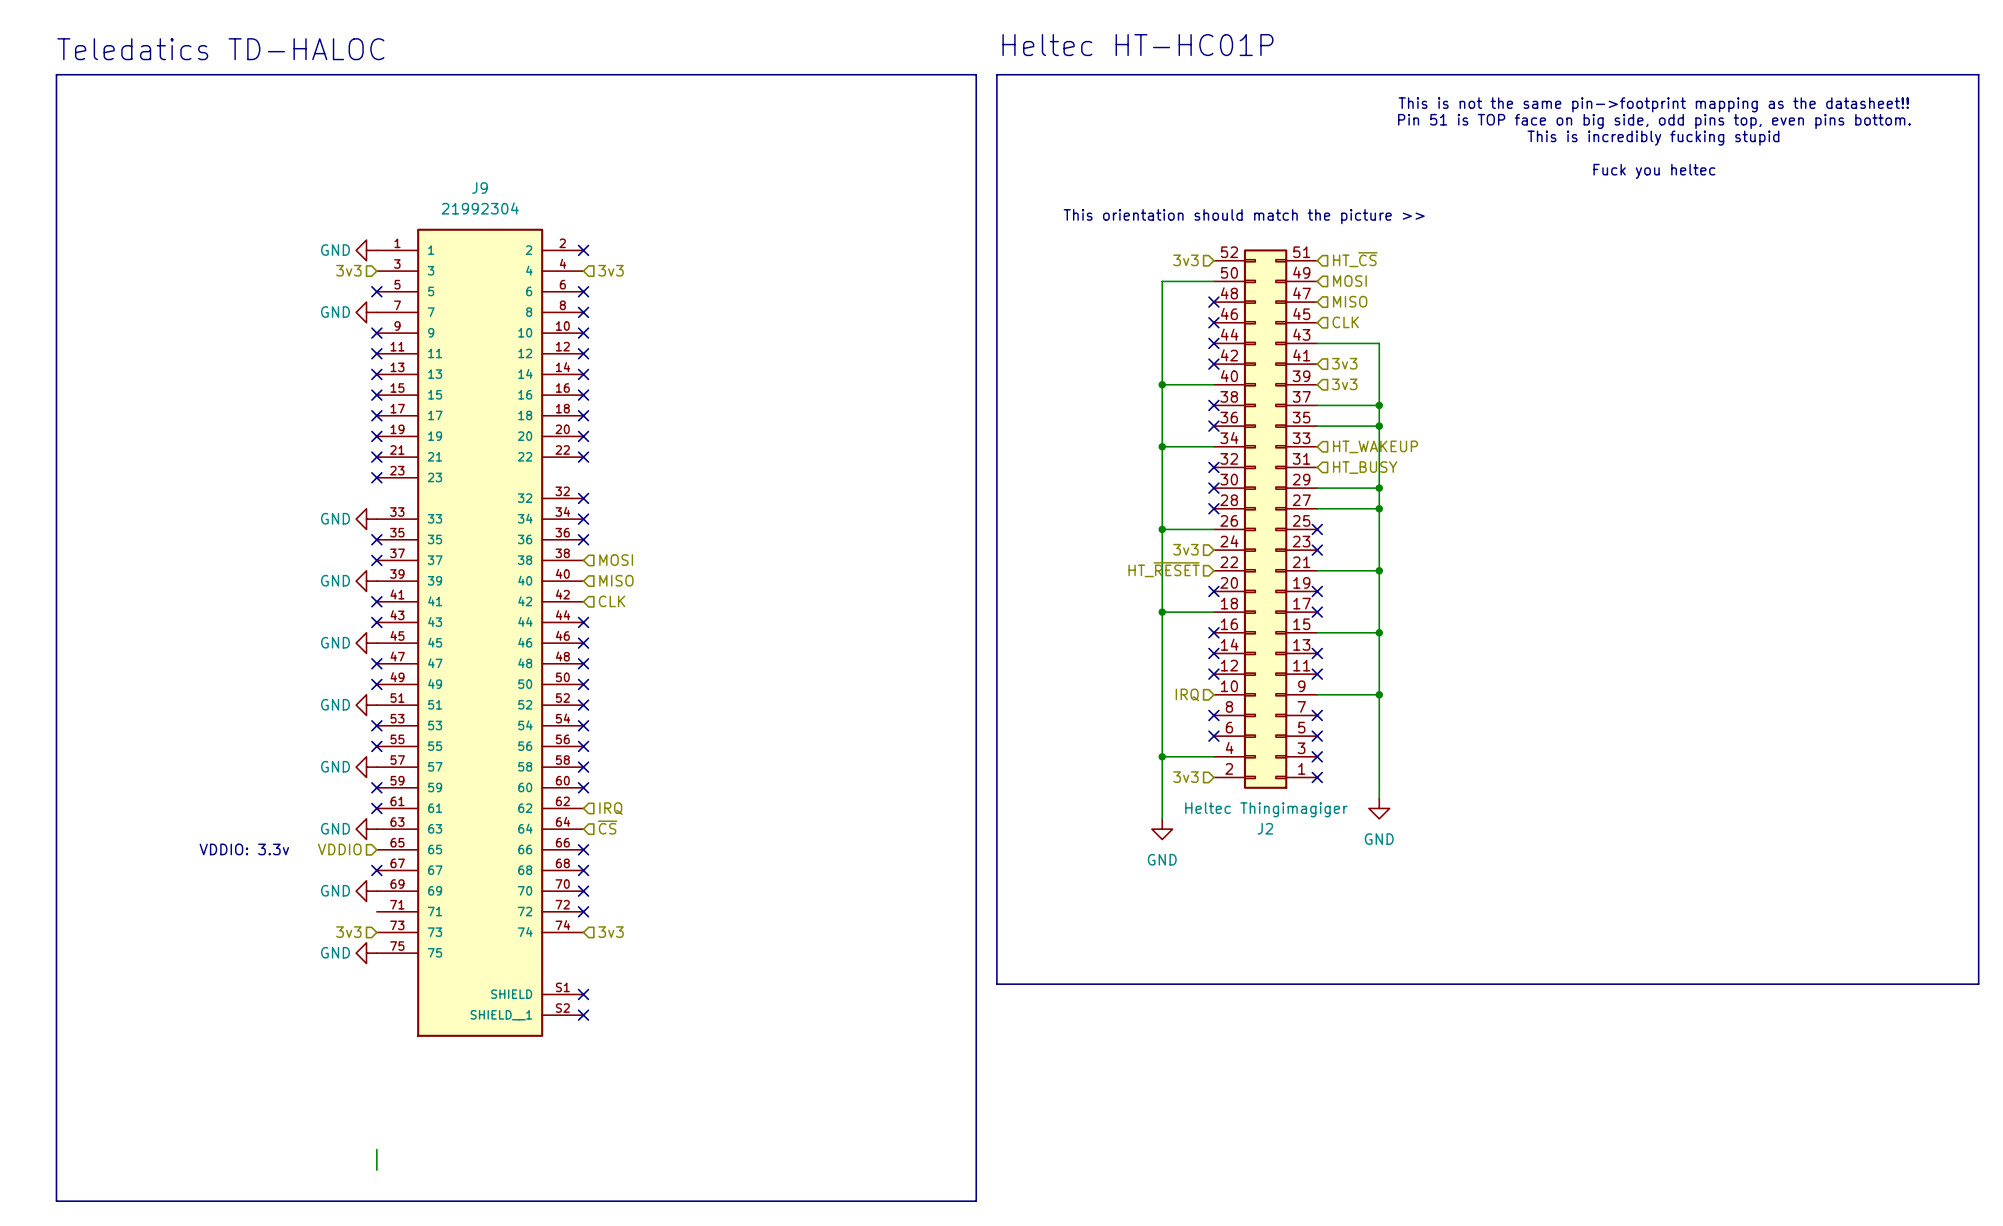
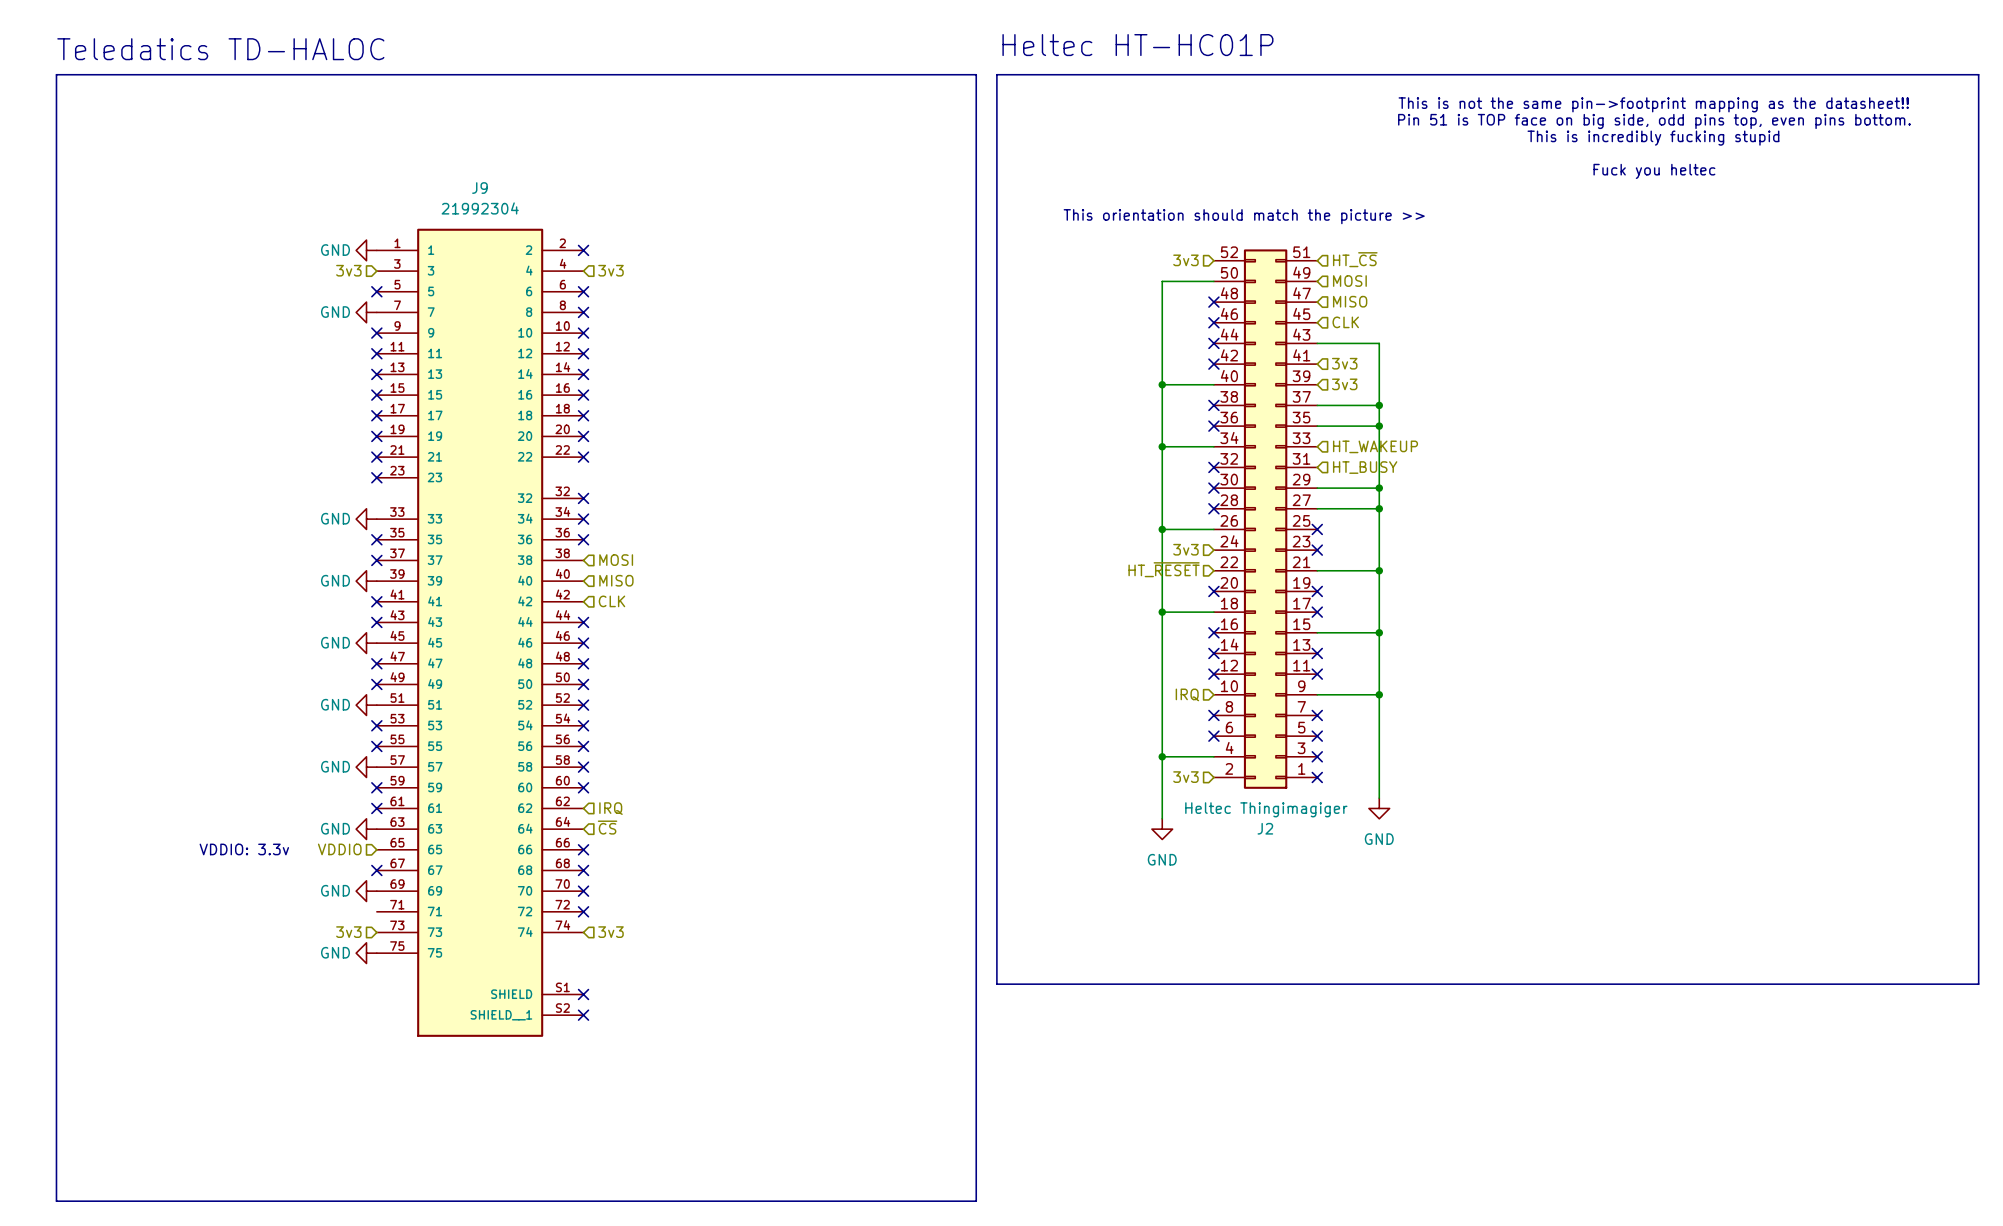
wire: (376, 1149) (376, 1170) -> none

